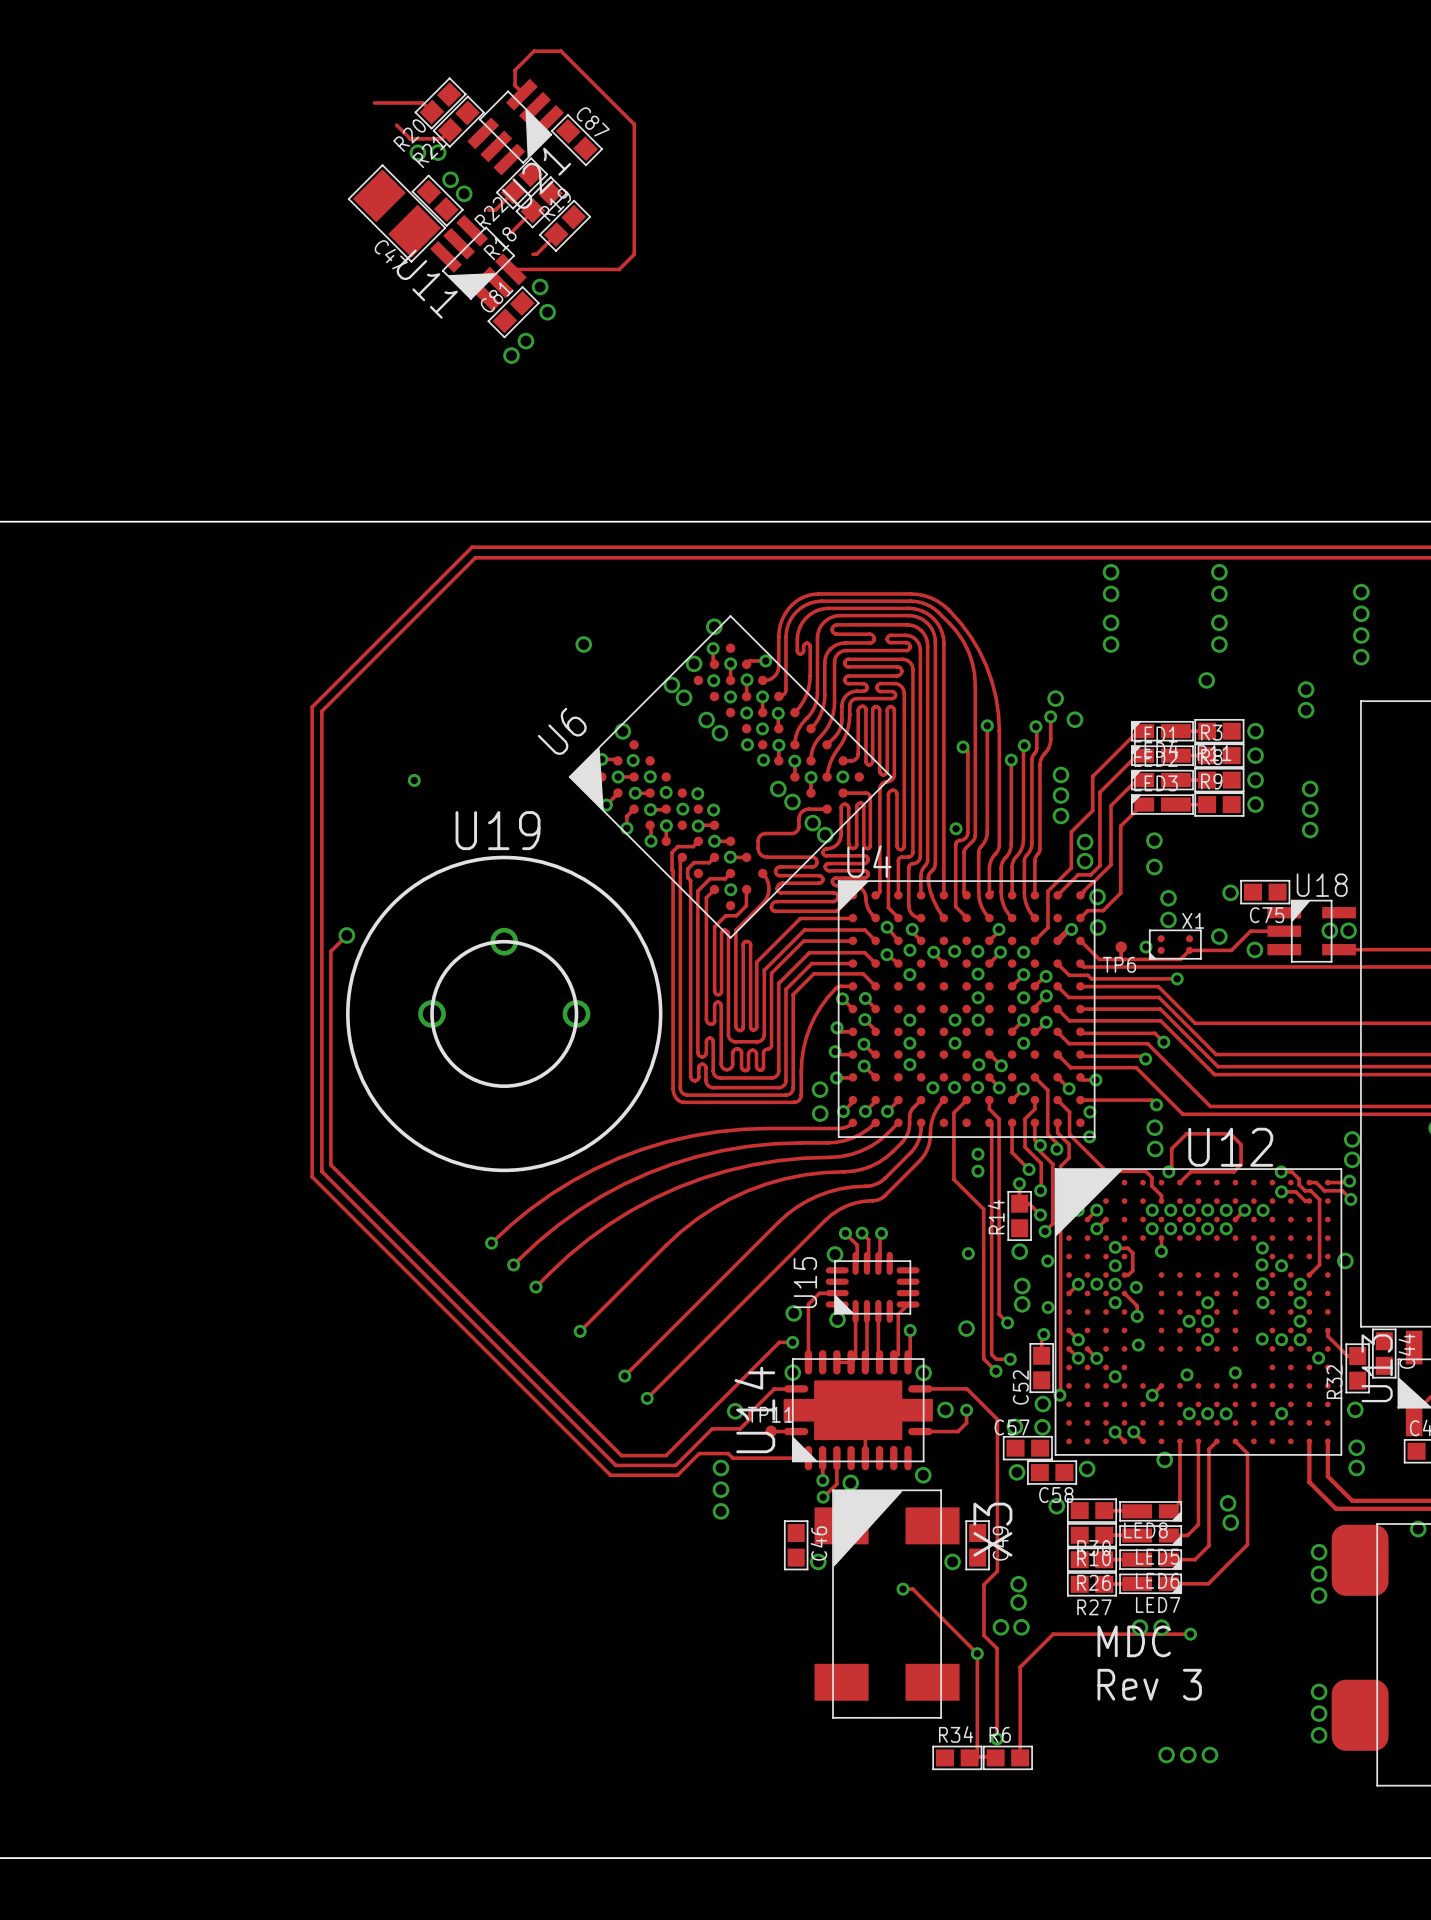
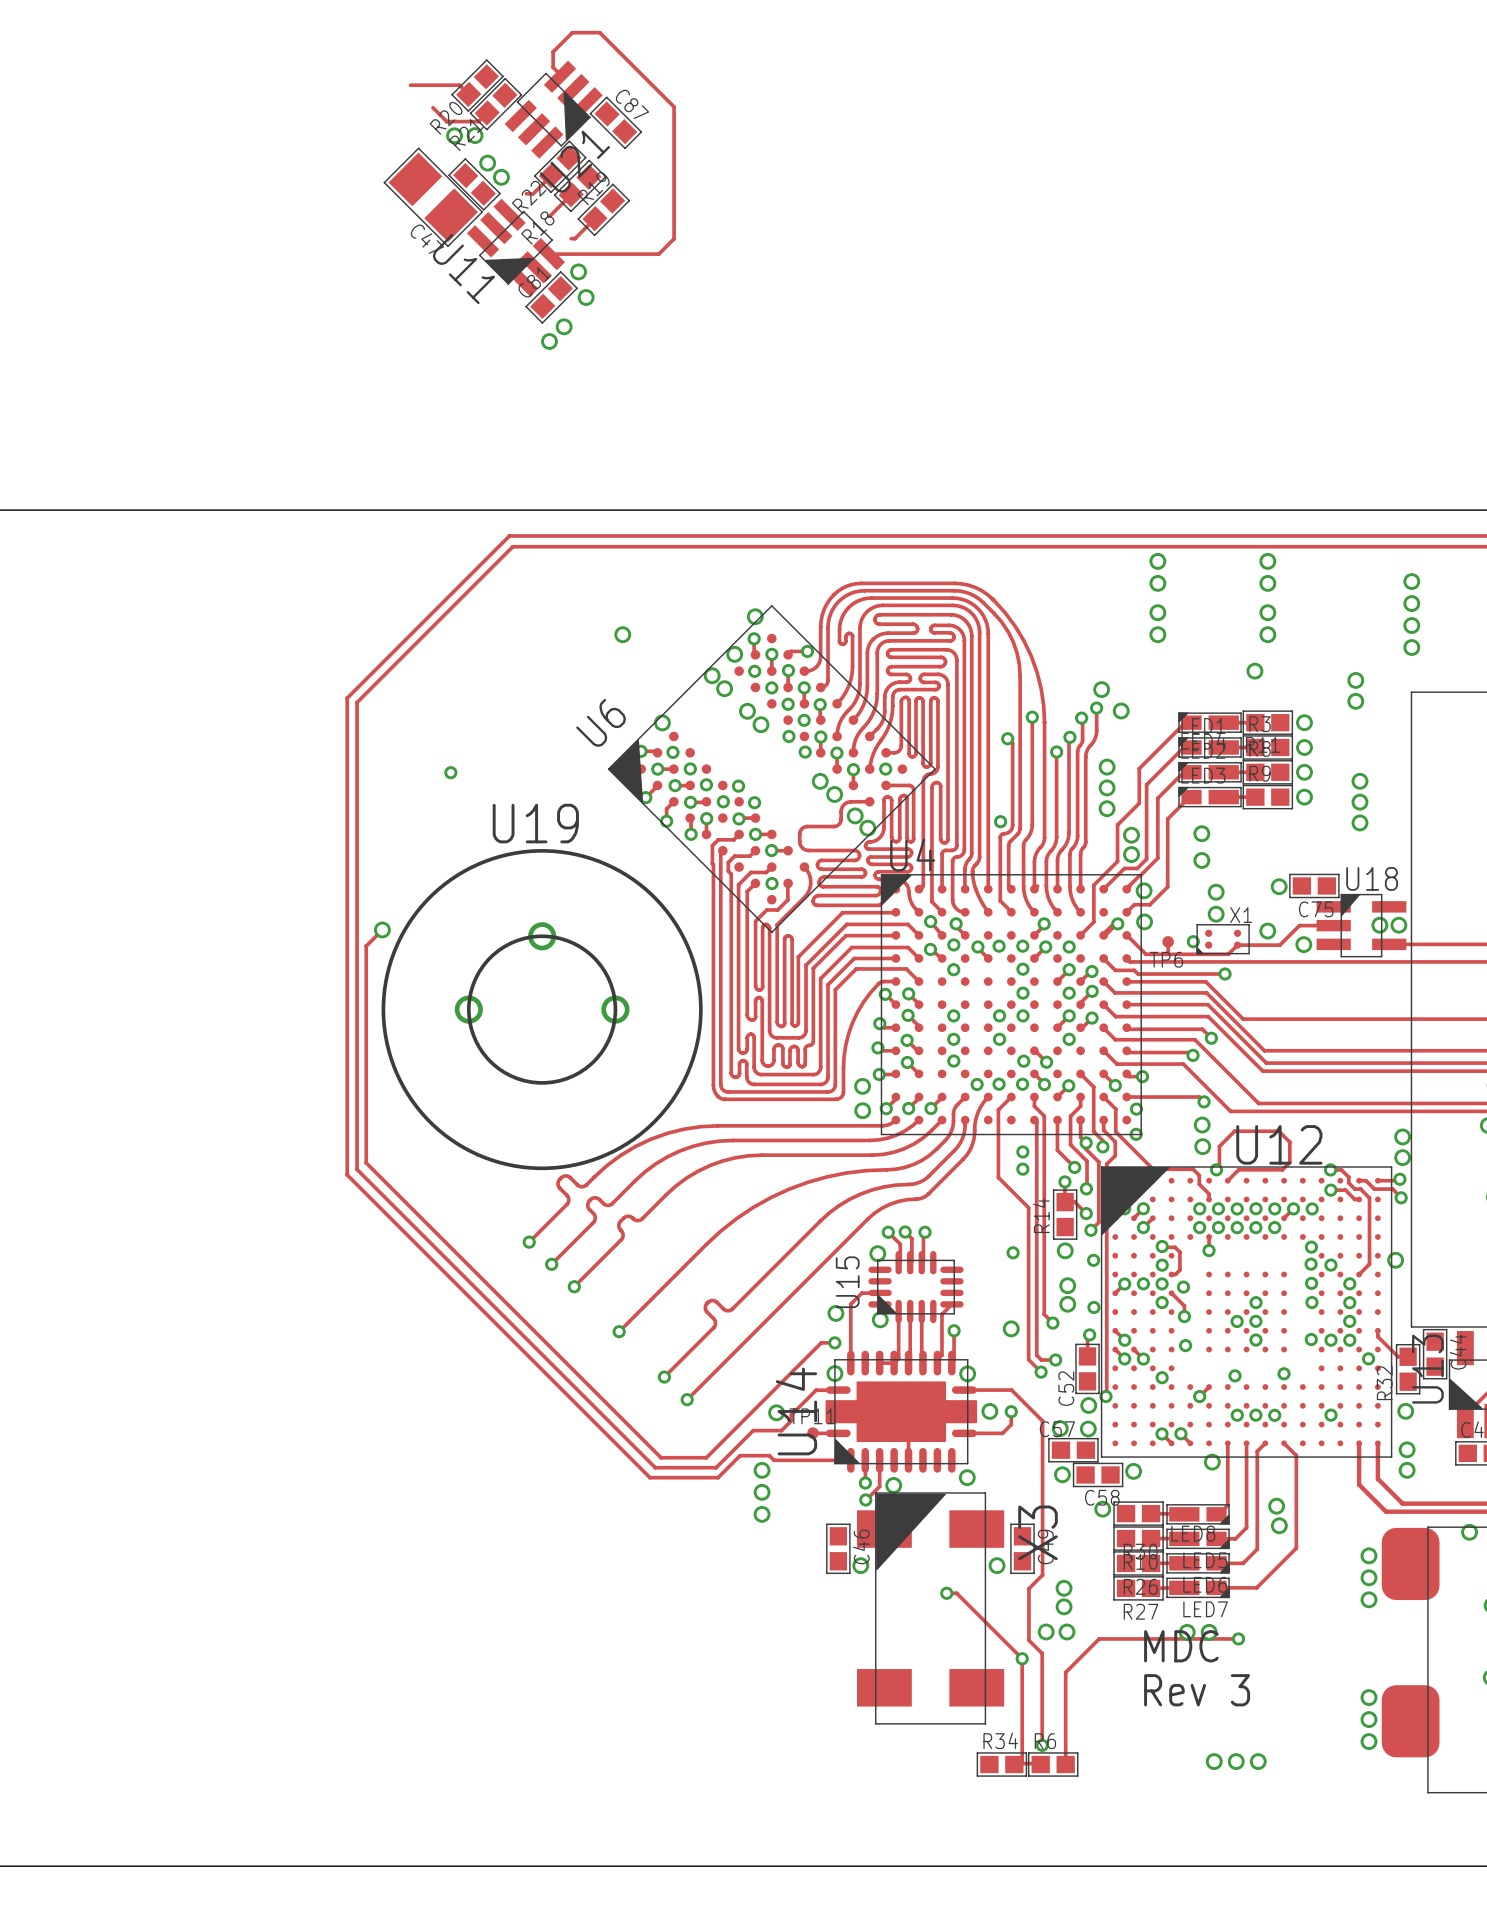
track: (768, 1128) (742, 1129) (691, 1136) (642, 1149) (618, 1158) (572, 1180) (550, 1194) (530, 1209) (491, 1243) -> (810, 1125) (700, 1126) (683, 1129) (651, 1139) (620, 1155) (584, 1186) (578, 1185) (568, 1176) (561, 1177) (558, 1185) (567, 1196) (567, 1203) (529, 1242)
track: (800, 1142) (748, 1146) (722, 1150) (672, 1164) (648, 1173) (601, 1196) (579, 1209) (558, 1225) (519, 1259) -> (842, 1140) (719, 1141) (679, 1151) (645, 1171) (611, 1204) (605, 1204) (596, 1198) (590, 1199) (587, 1206) (594, 1215) (594, 1221) (557, 1258)
track: (829, 1157) (777, 1160) (752, 1164) (727, 1170) (678, 1187) (631, 1210) (609, 1223) (588, 1239) (549, 1273) -> (872, 1155) (748, 1155) (710, 1165) (676, 1185) (641, 1219) (636, 1220) (629, 1216) (623, 1218) (618, 1224) (622, 1233) (622, 1238) (588, 1272)
track: (691, 1308) (673, 1327) -> (732, 1308) (725, 1310) (714, 1300) (707, 1303) (705, 1309) (715, 1320) (713, 1327)

